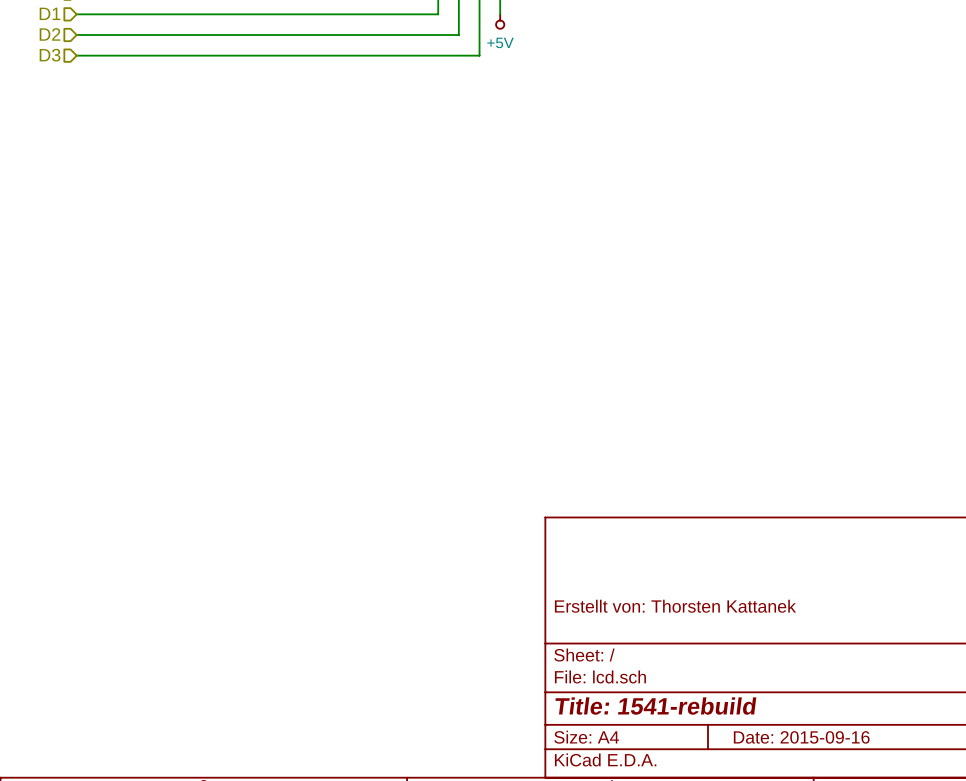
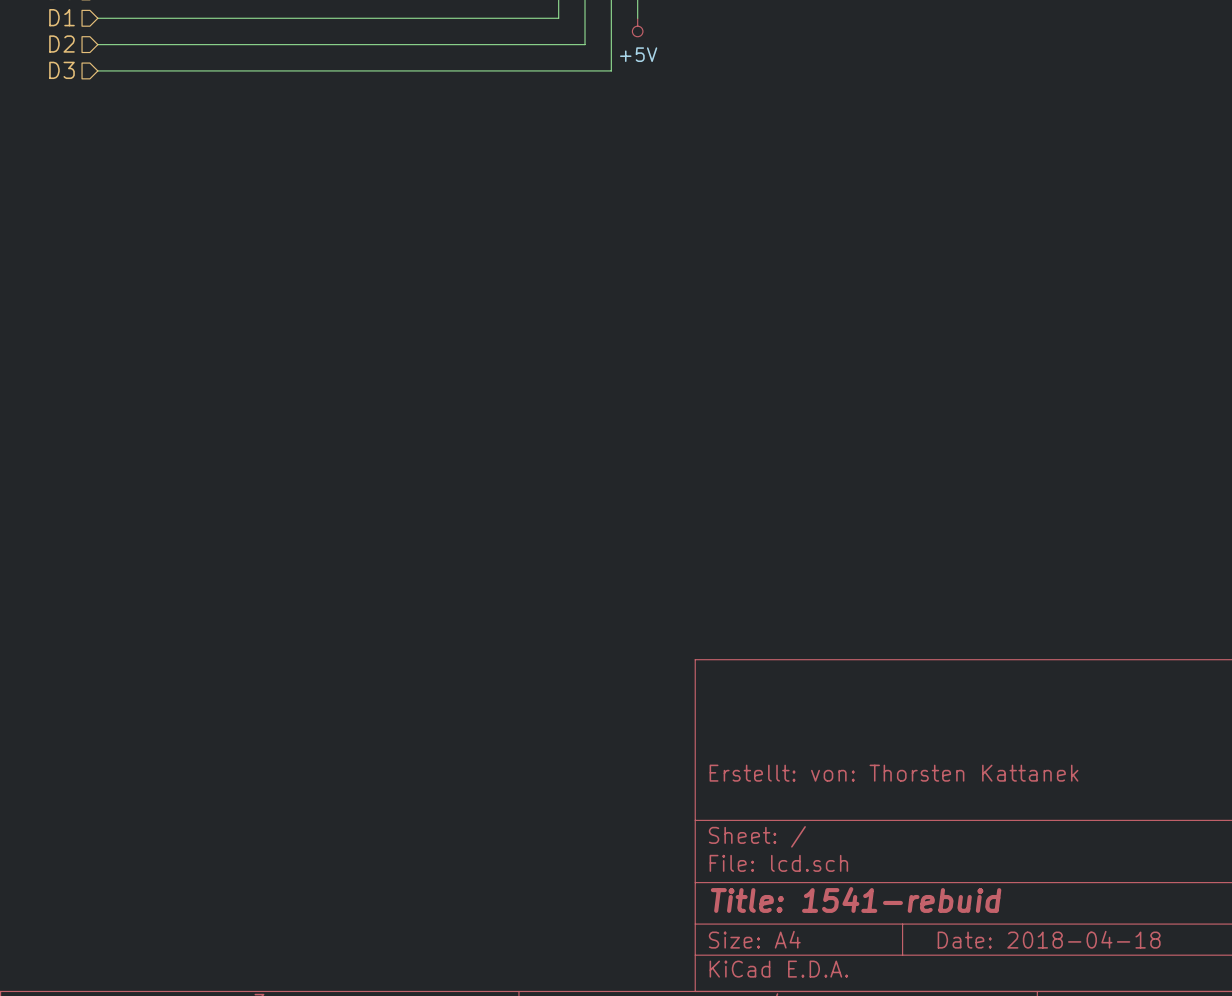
title block: Erstellt von: Thorsten Kattanek (675, 606) -> Erstellt: von: Thorsten Kattanek (894, 773)
title block: Title: 1541-rebuild (655, 706) -> Title: 1541-rebuid (856, 900)
title block: Date: 2015-09-16 (801, 737) -> Date: 2018-04-18 (1049, 939)

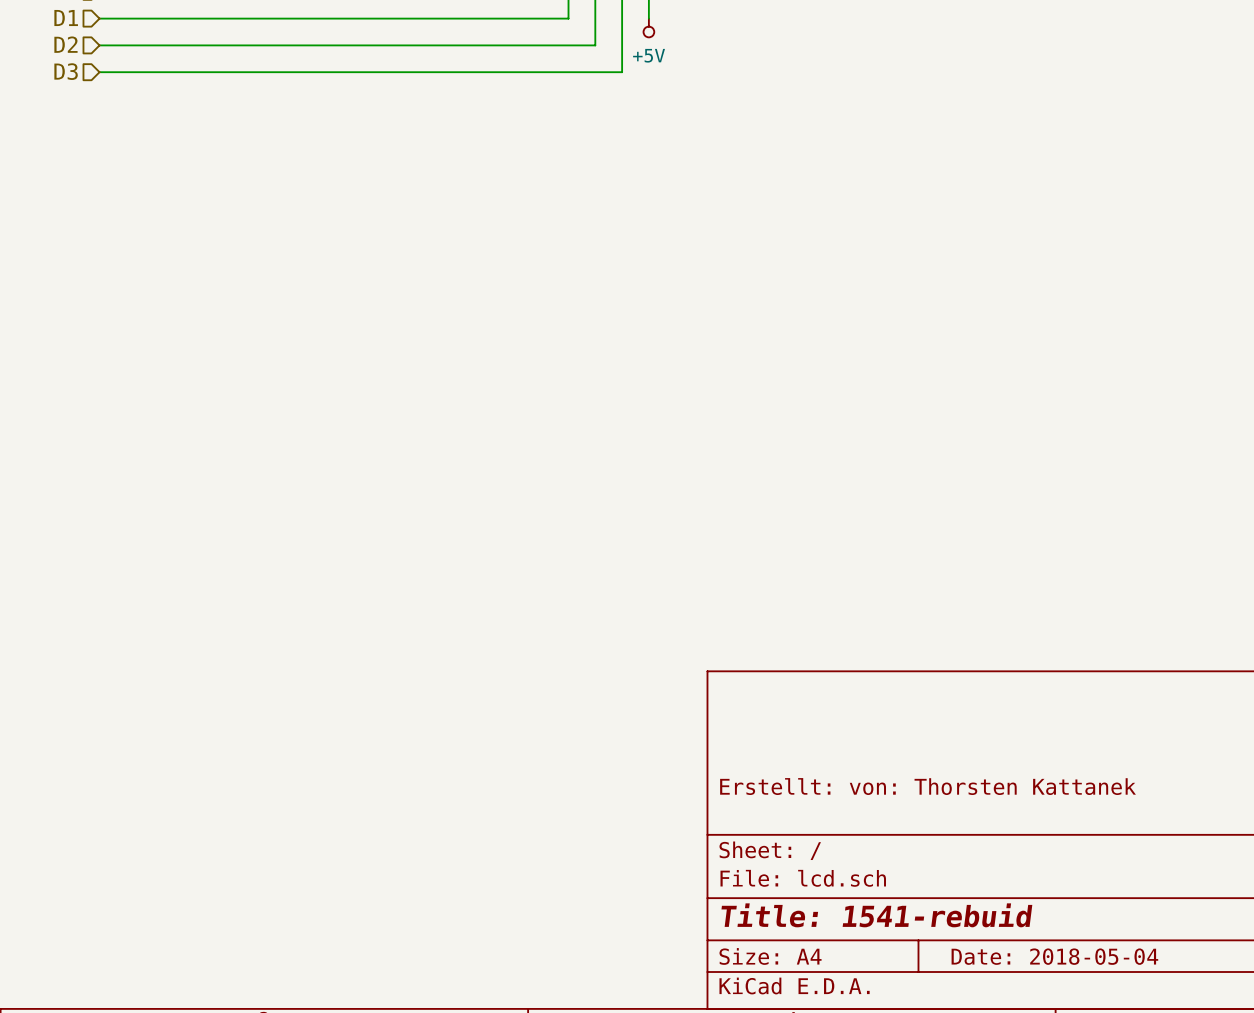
title block: Date: 2018-04-18 (1049, 939) -> Date: 2018-05-04 (1054, 956)

